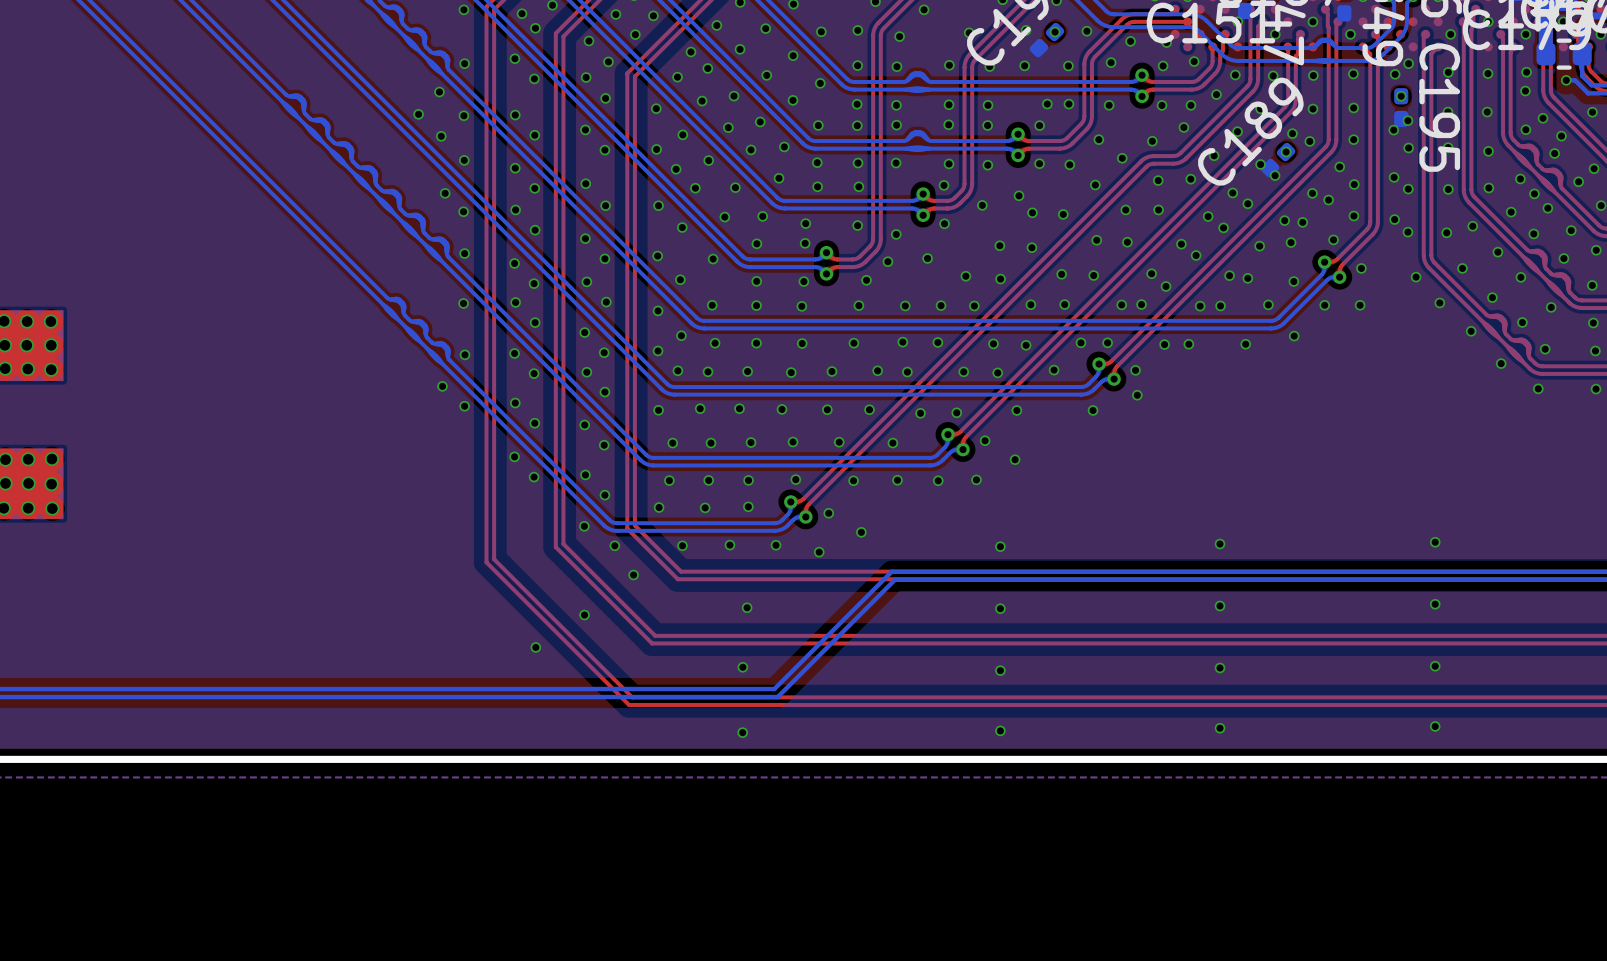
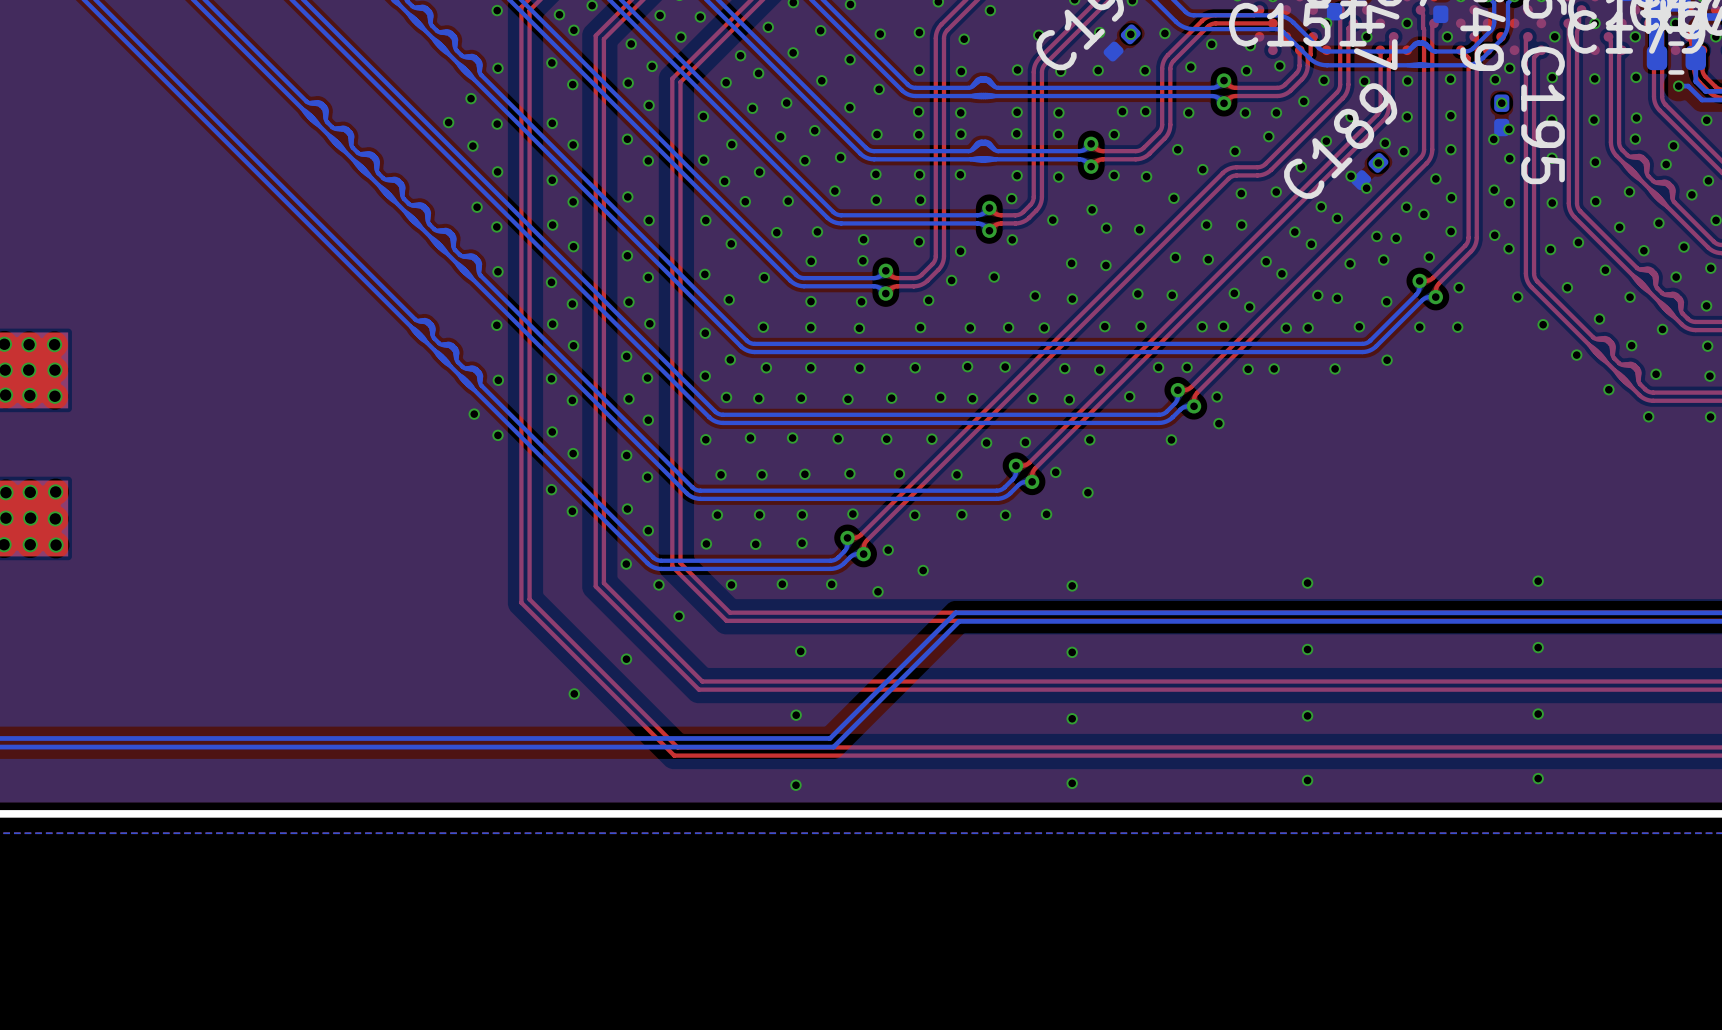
via: (1525, 91) -> none
via: none -> (1636, 117)
via: (1543, 118) -> none
via: (1534, 193) -> none

